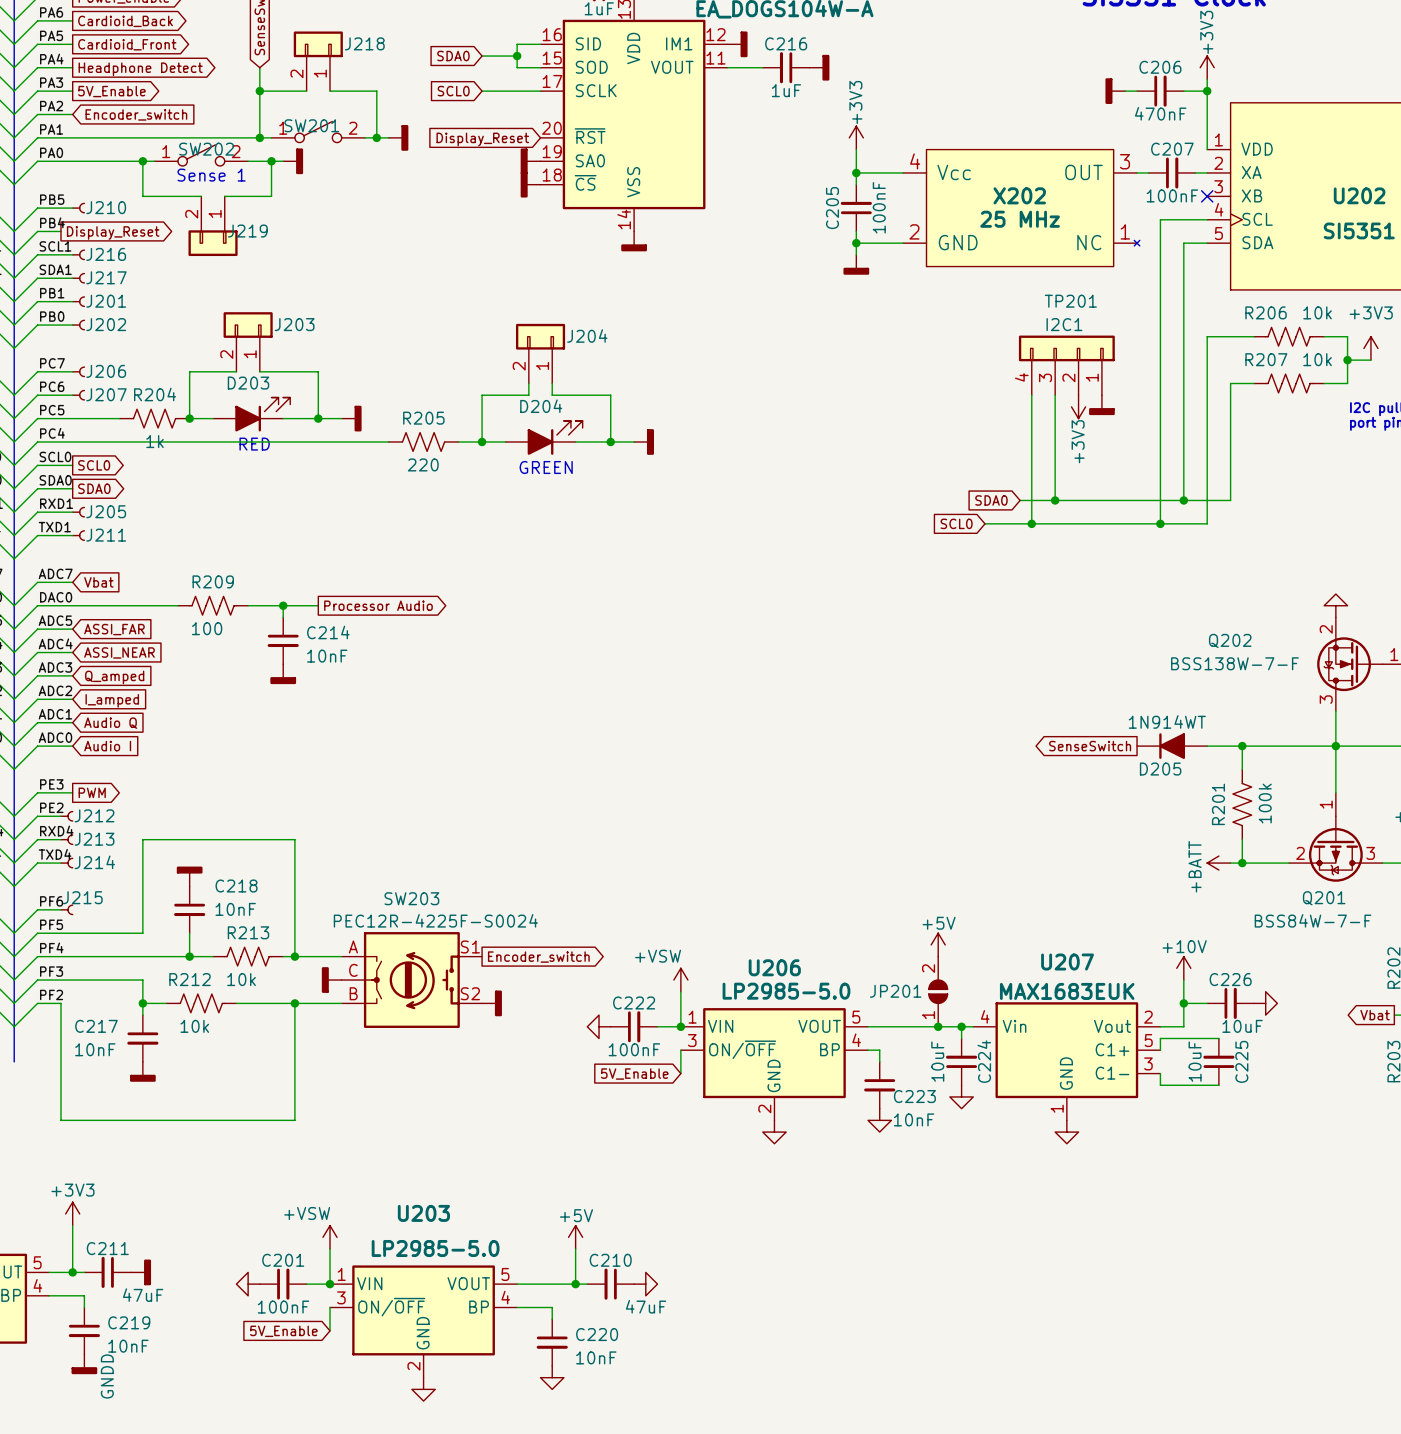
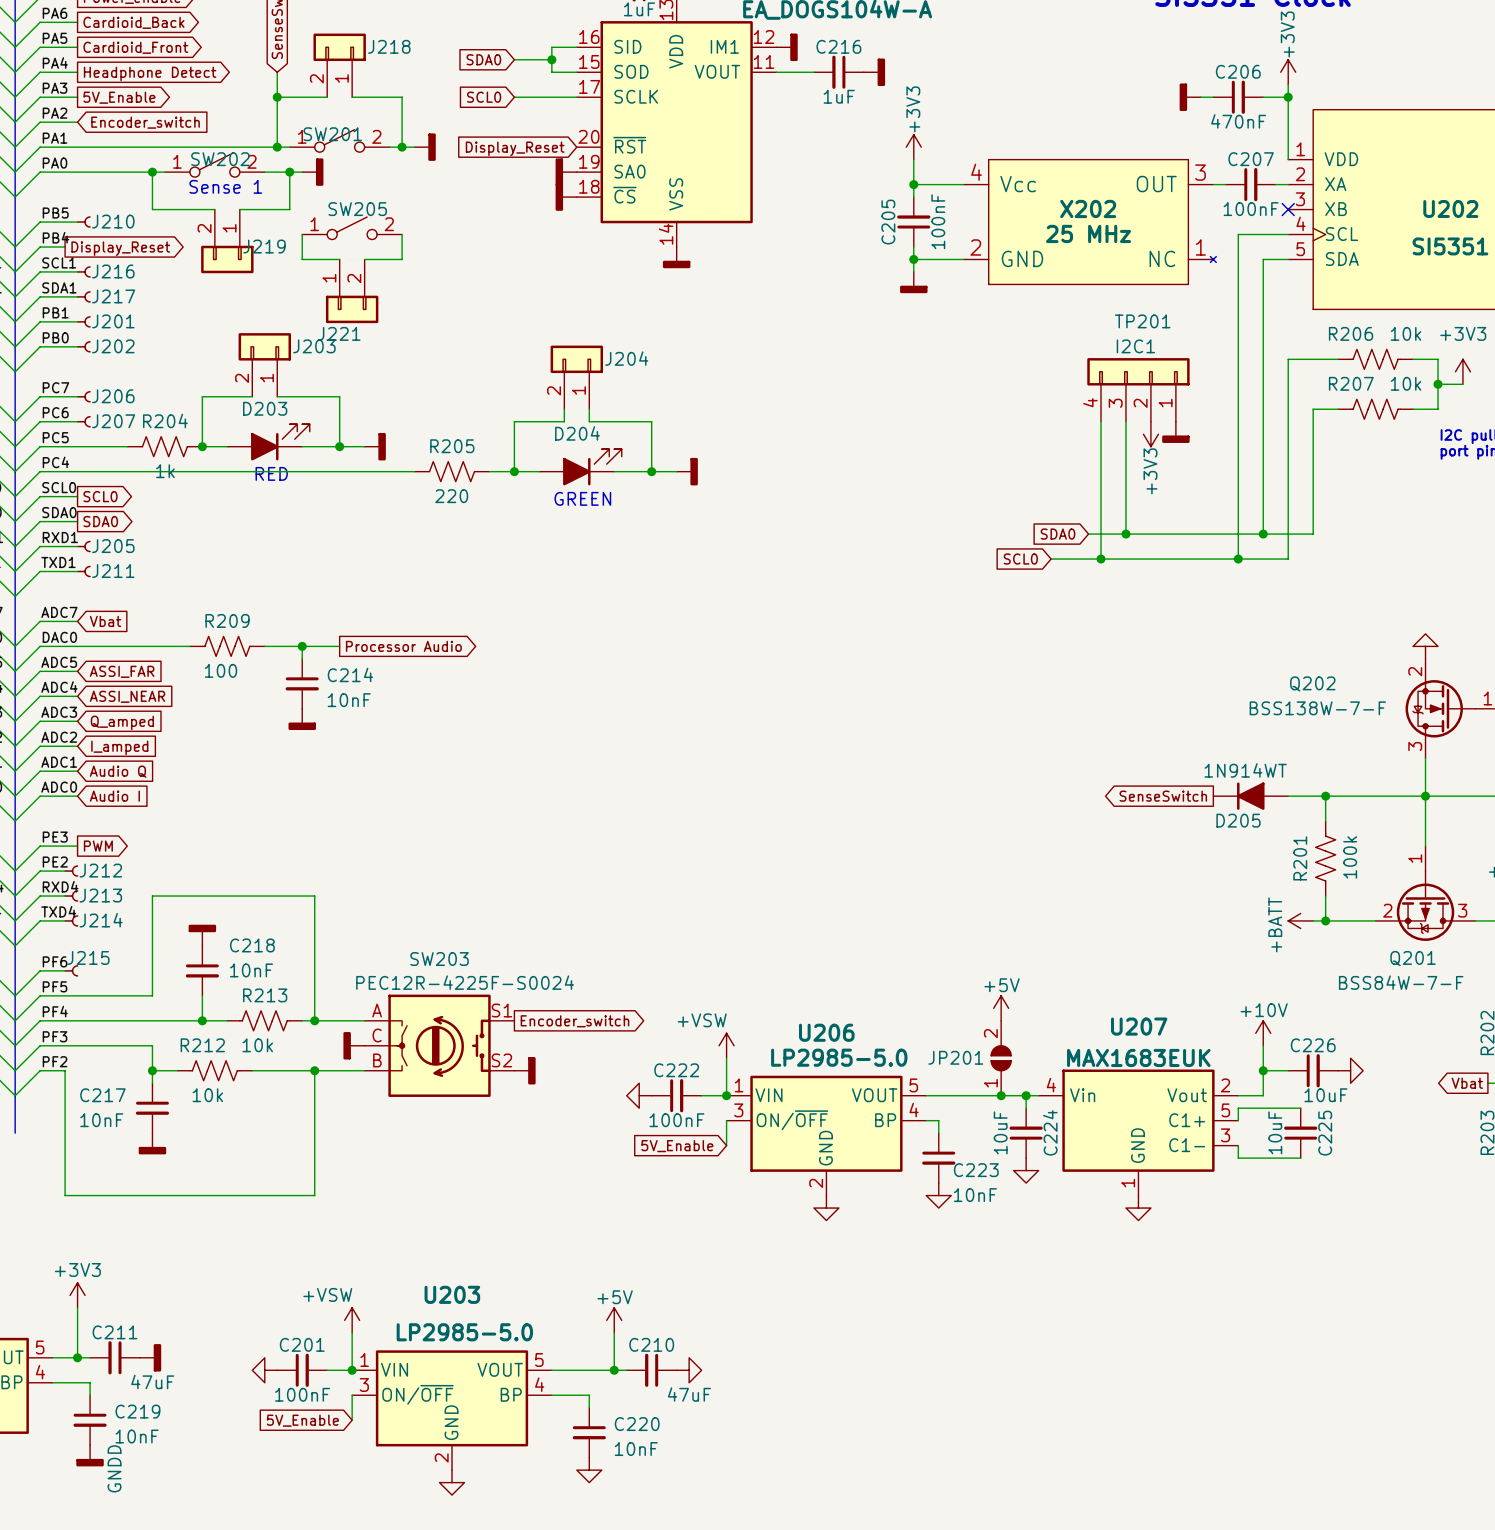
SW205: none -> (352, 228)
wire: none -> (302, 234) (302, 259) (339, 259)
wire: none -> (402, 234) (402, 259) (364, 259)
J221: none -> (352, 291)

